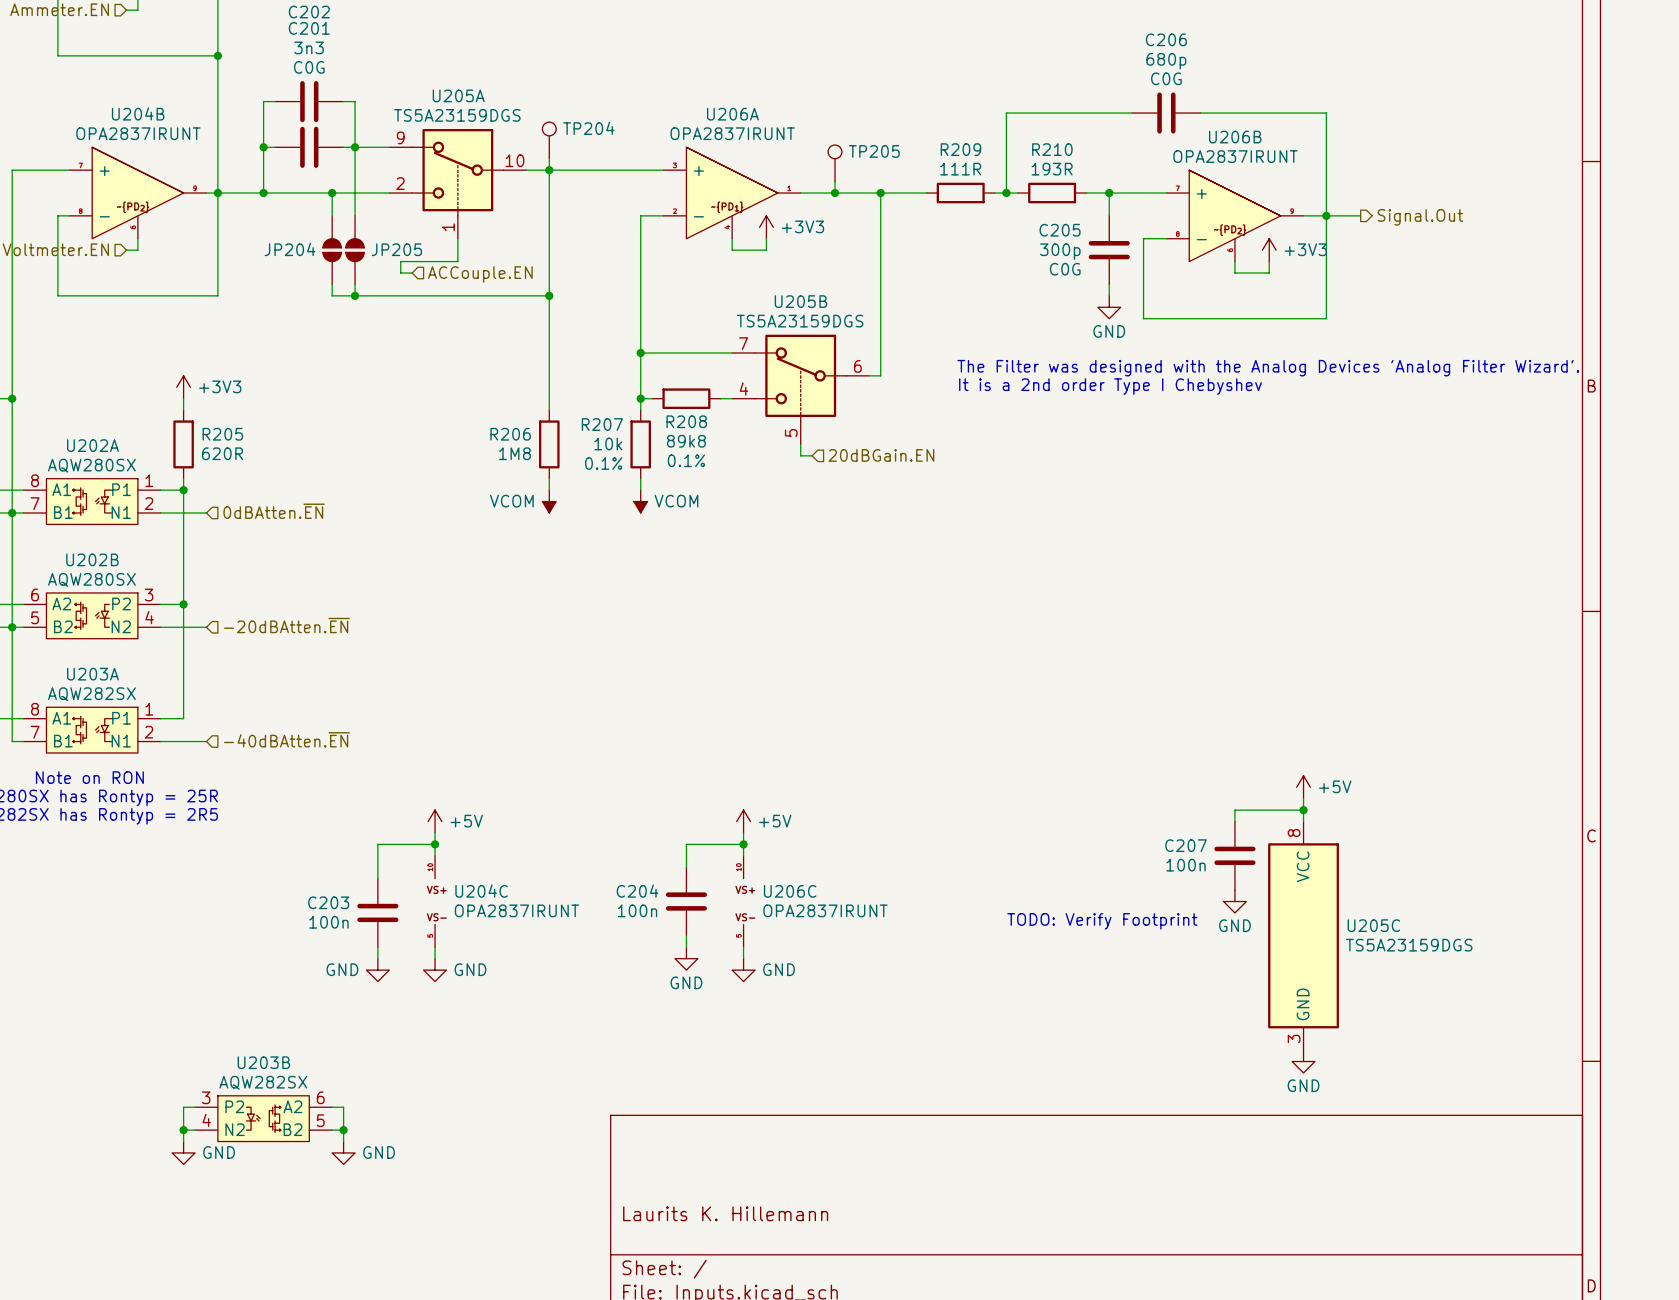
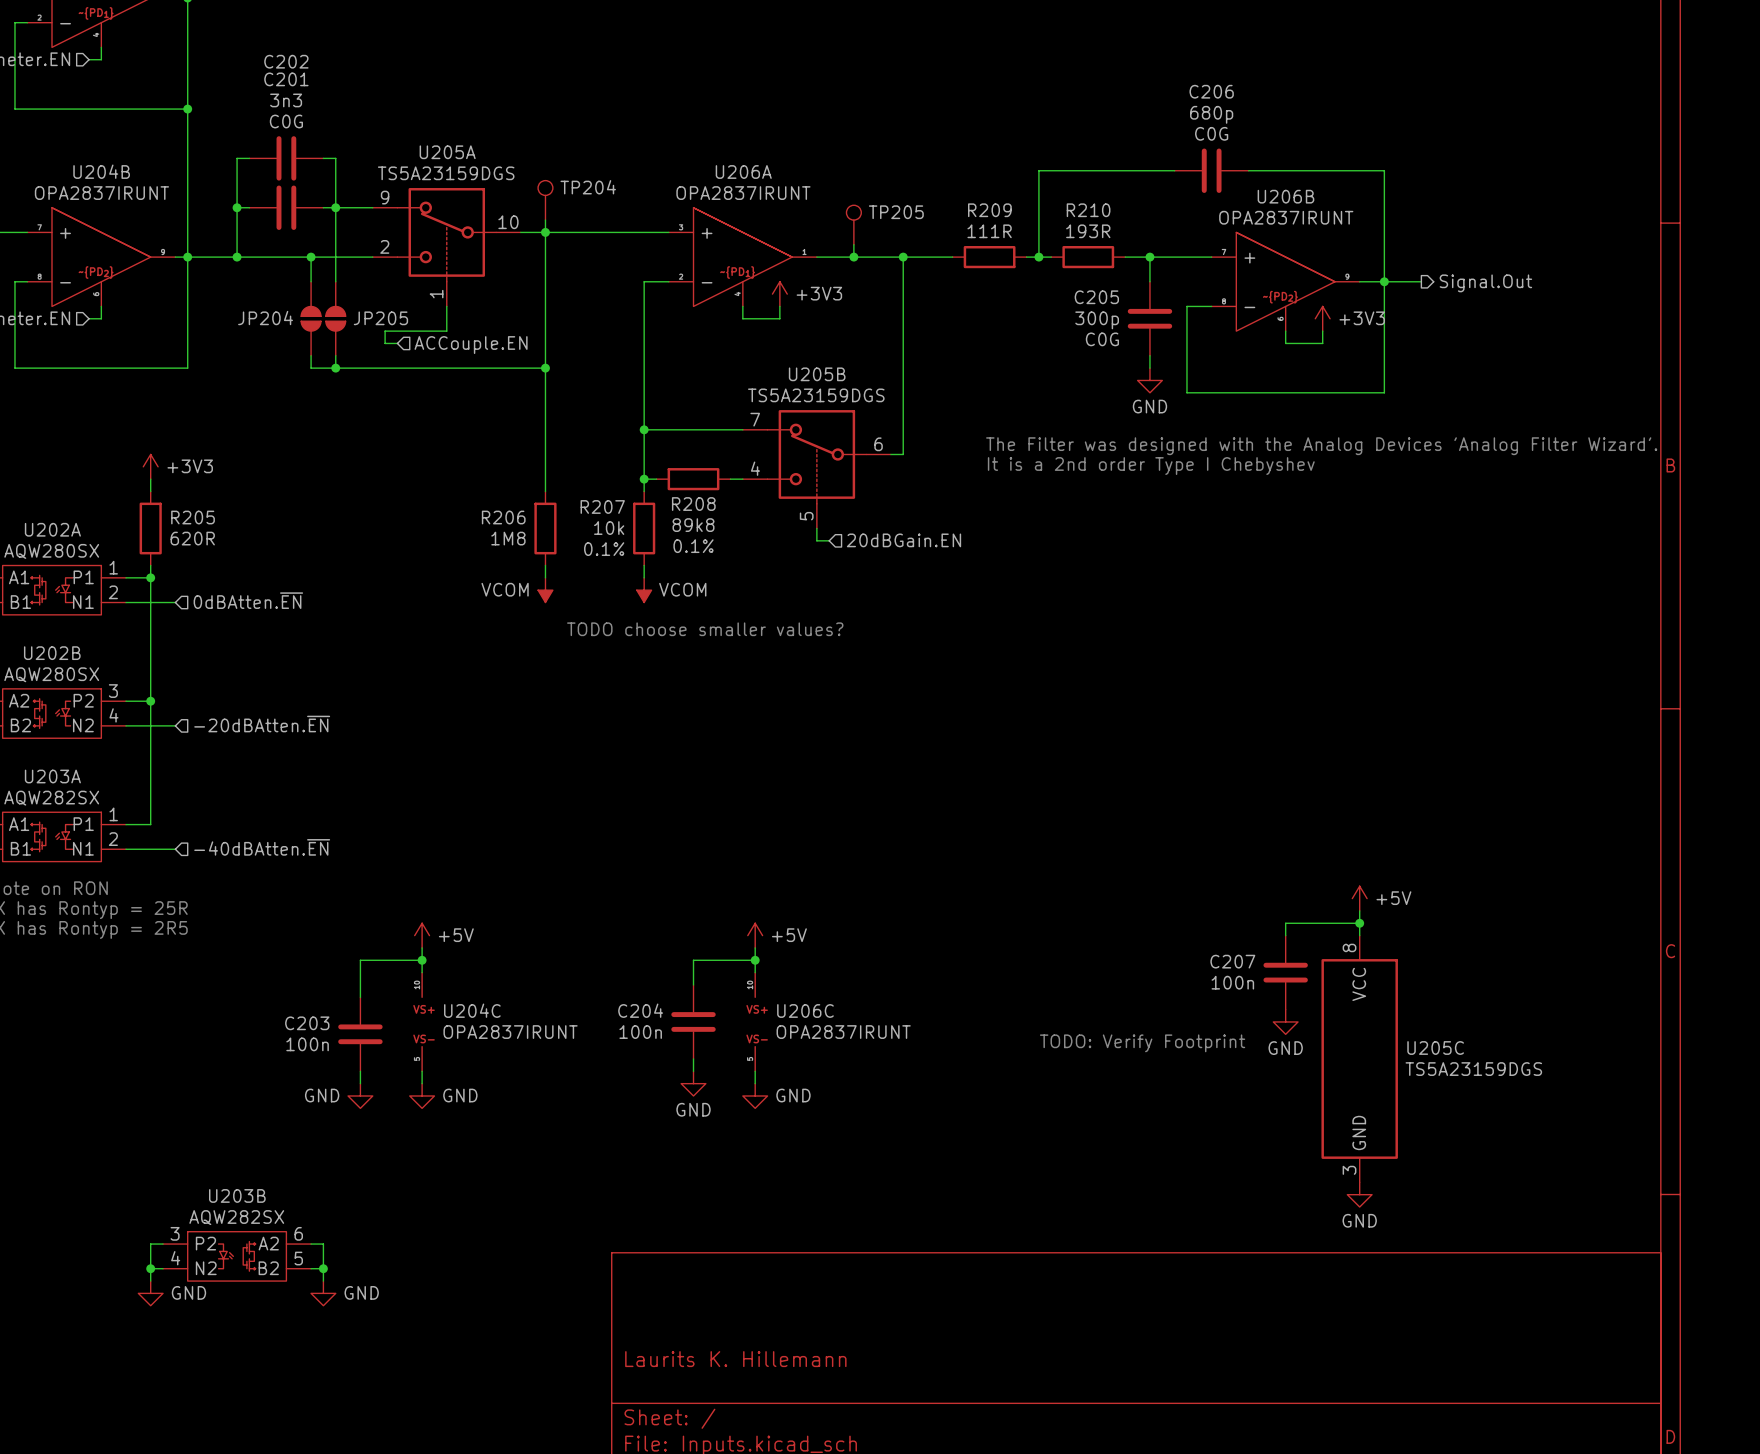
text: none -> TODO choose smaller values? (705, 629)

